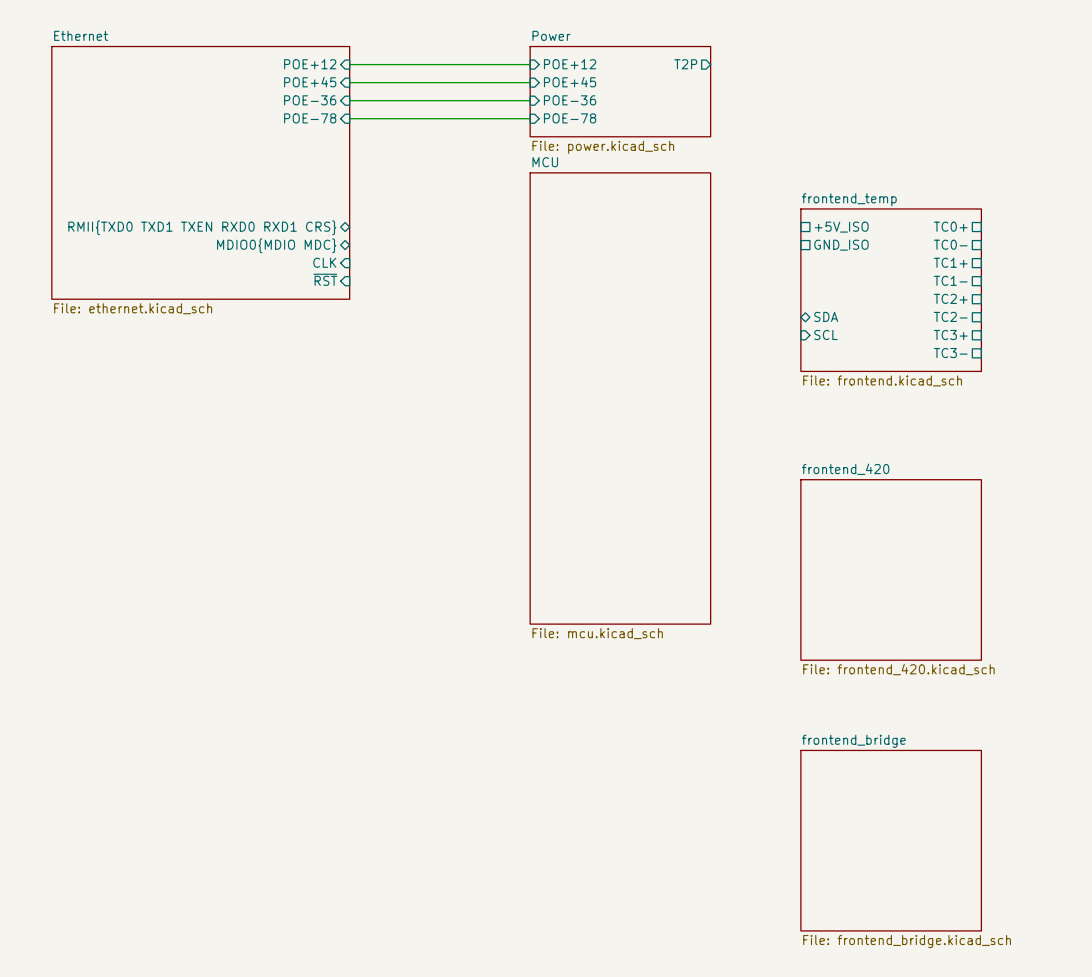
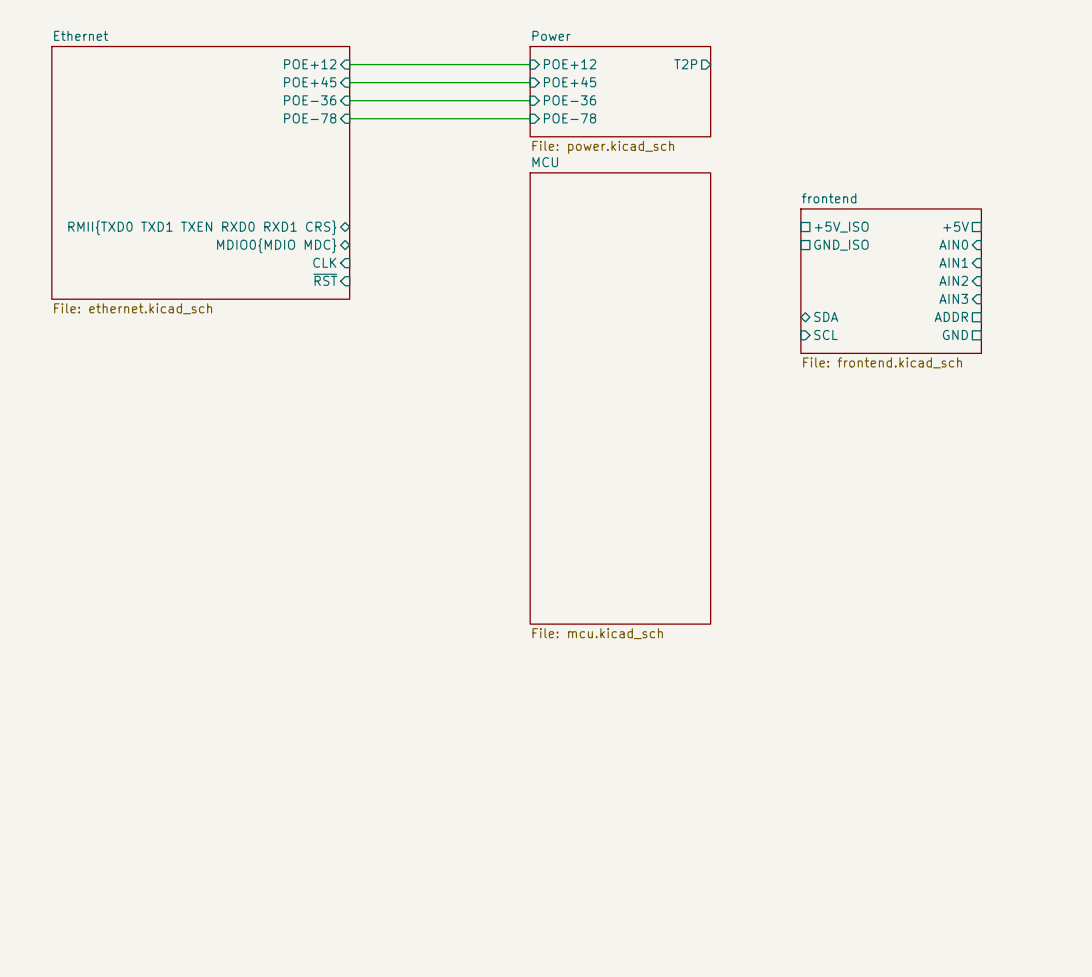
sheet pin: TC0+ (950, 226) -> +5V (956, 226)
sheet pin shape: passive (950, 244) -> input (953, 244)
sheet pin: TC0- (950, 244) -> AIN0 (953, 244)
sheet pin shape: passive (950, 262) -> input (953, 262)
sheet pin: TC1+ (950, 262) -> AIN1 (953, 262)
sheet pin shape: passive (950, 280) -> input (953, 280)
sheet pin: TC1- (950, 280) -> AIN2 (953, 280)
sheet frontend: none -> File: frontend.kicad_sch (891, 281)
sheet frontend_temp: File: frontend.kicad_sch (891, 290) -> none
sheet pin shape: passive (950, 298) -> input (953, 298)
sheet pin: TC2+ (950, 298) -> AIN3 (953, 298)
sheet pin: TC2- (950, 316) -> ADDR (951, 316)
sheet pin: TC3+ (950, 334) -> GND (955, 334)
sheet pin: TC3- (950, 353) -> none
sheet frontend_420: File: frontend_420.kicad_sch (891, 569) -> none
sheet frontend_bridge: File: frontend_bridge.kicad_sch (891, 840) -> none

